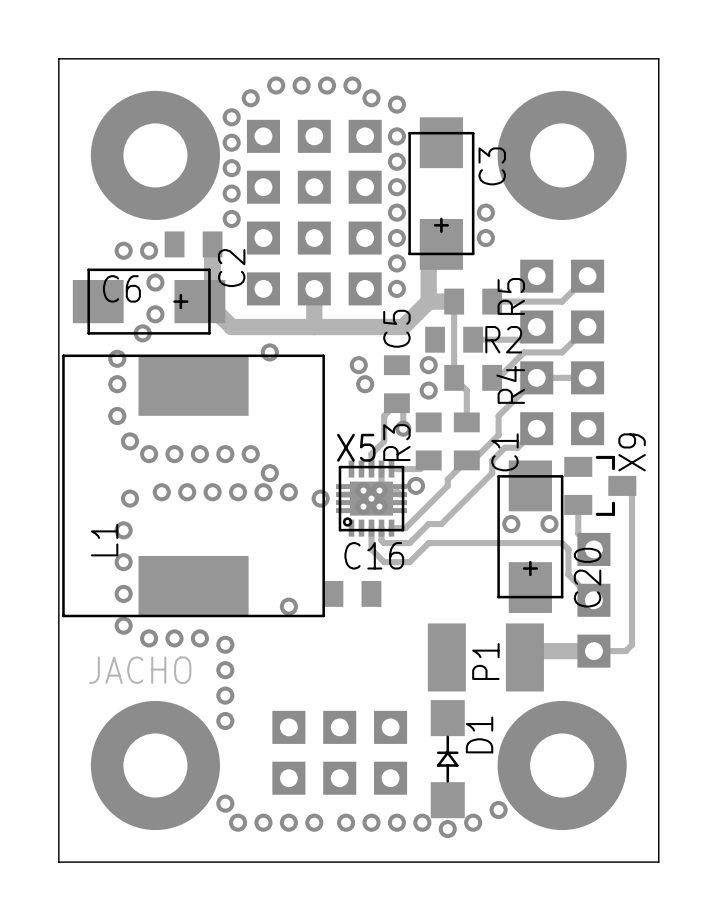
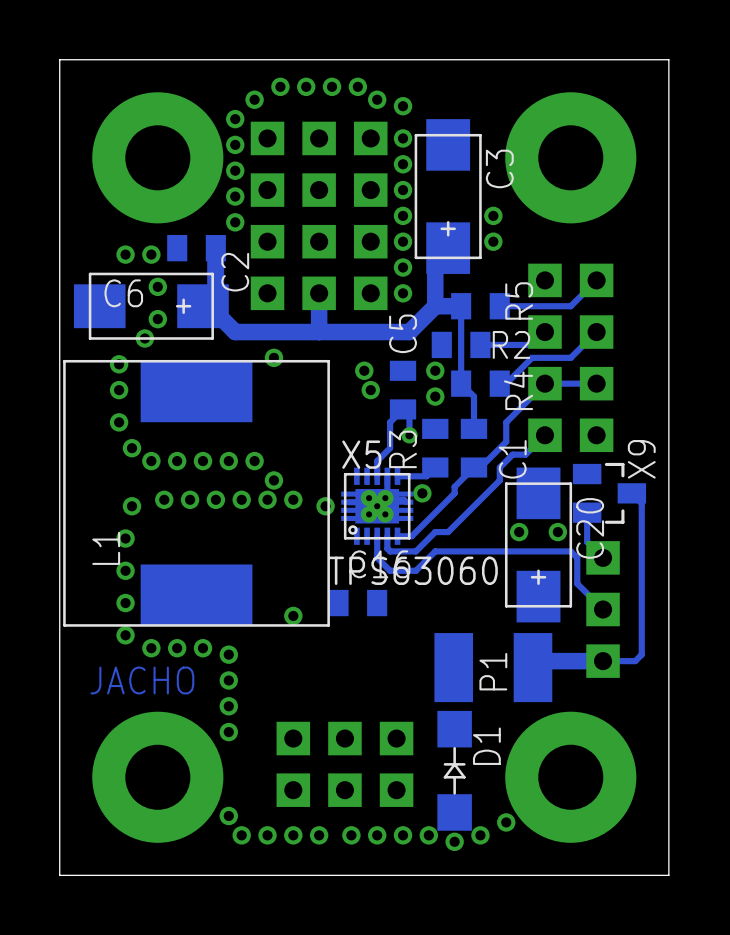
X5 value: none -> TPS63060 (413, 570)
C20 name position: C20 (587, 577) -> C20 (590, 528)

